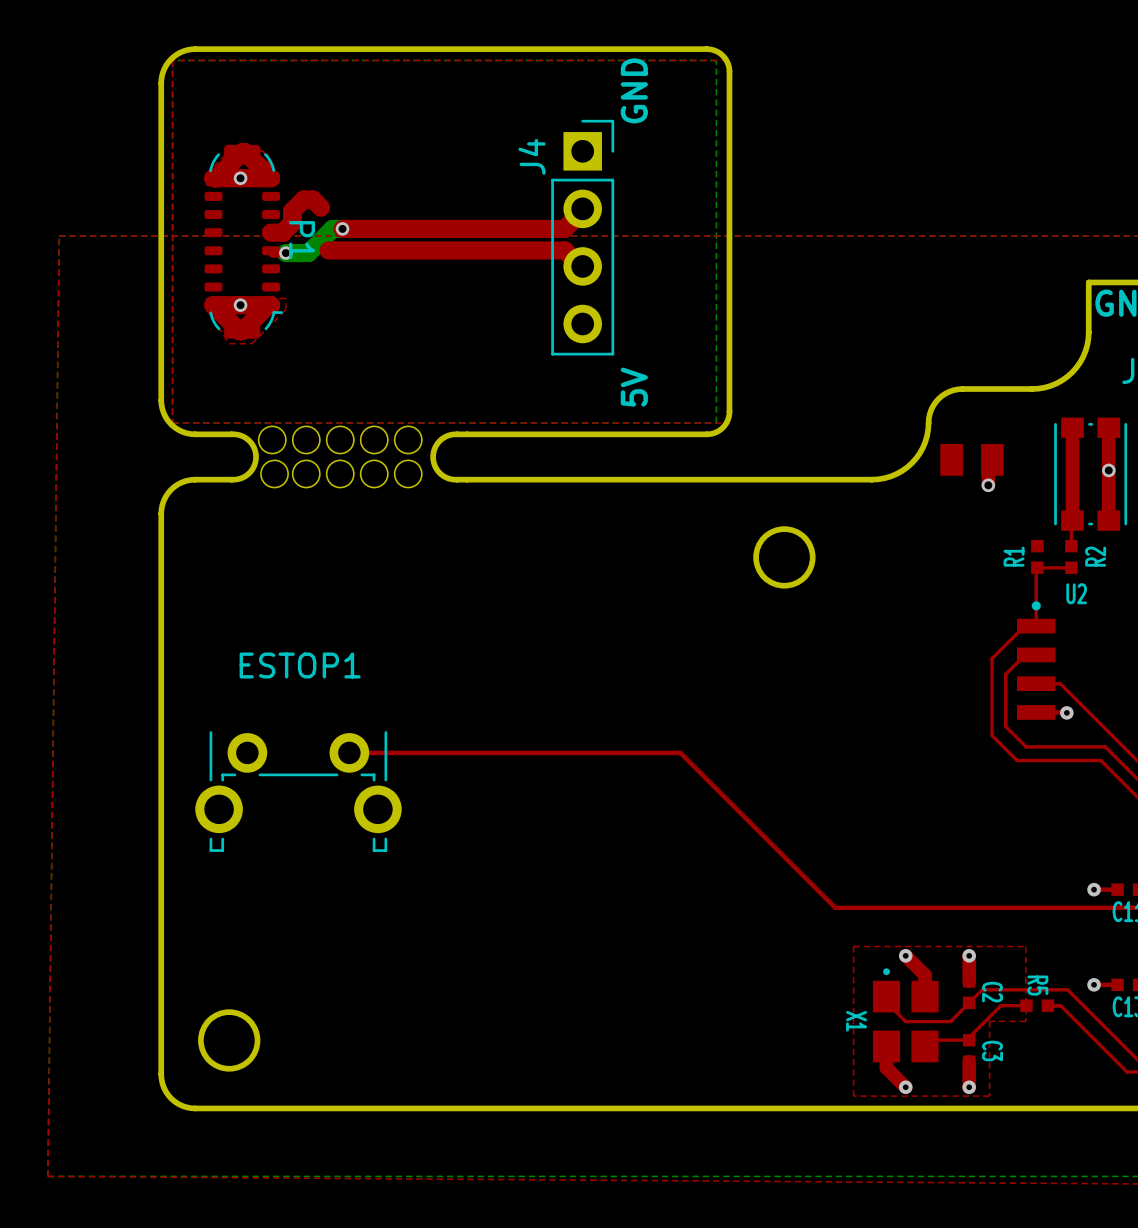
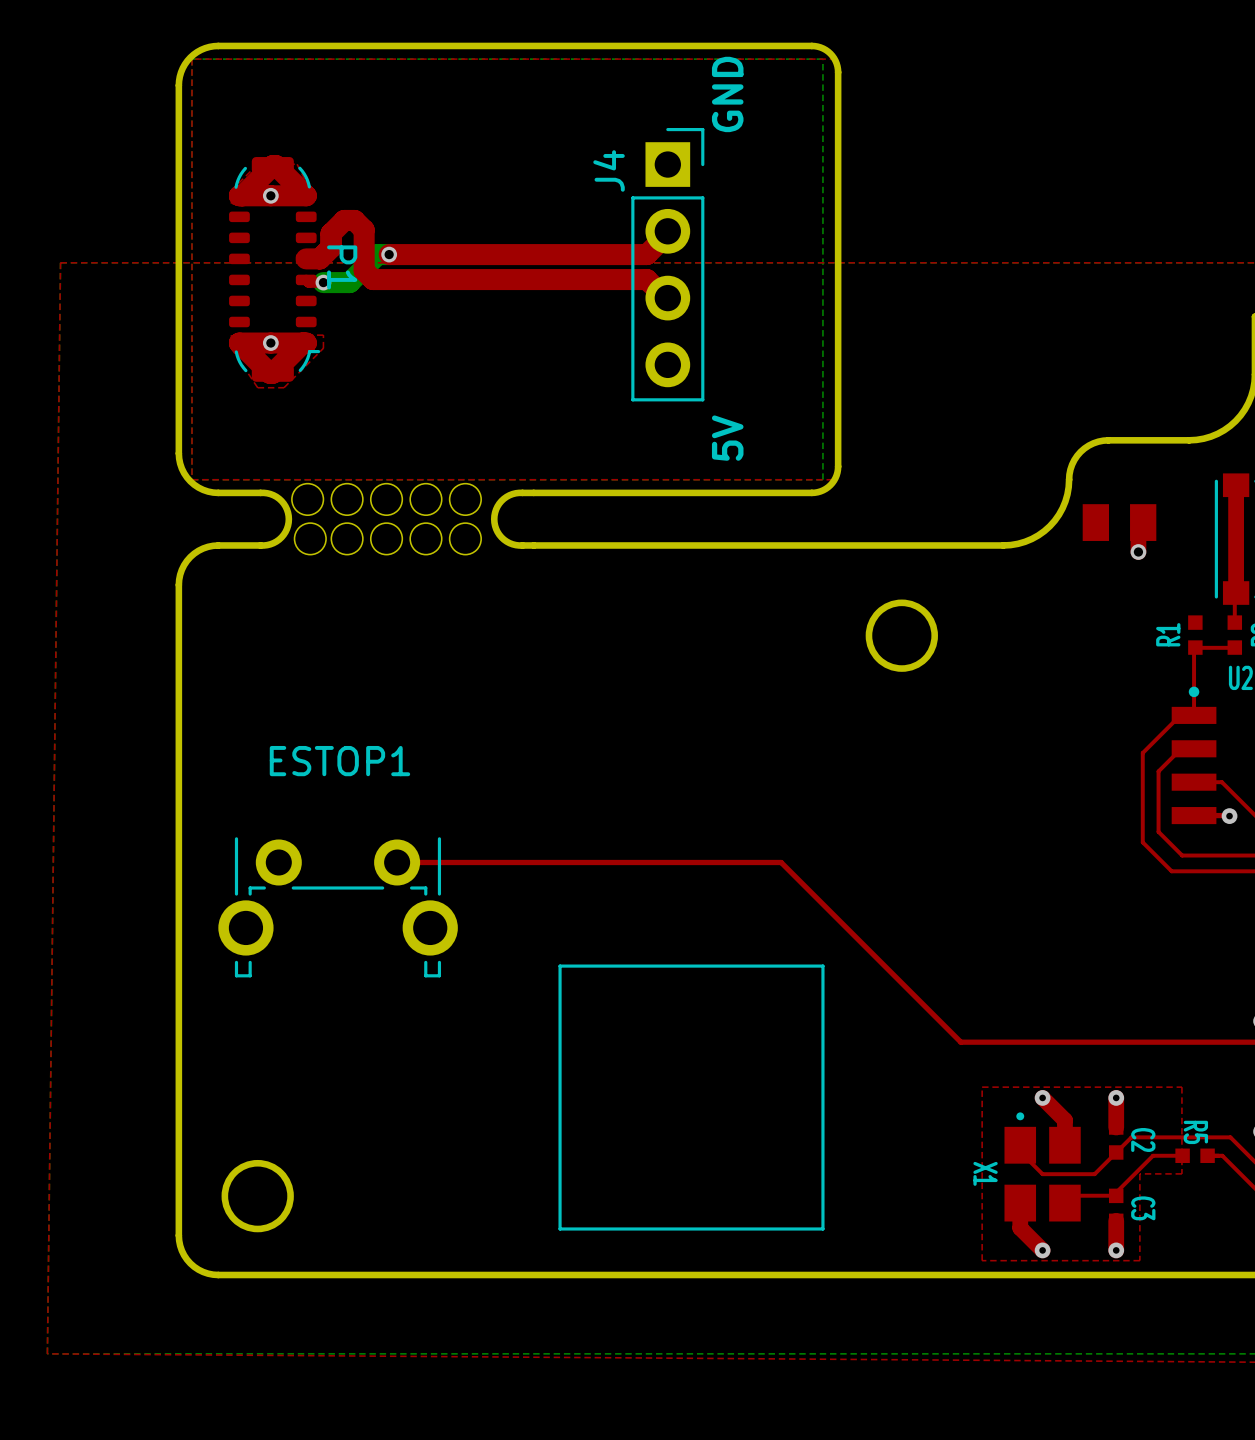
top track: none -> (364, 230) (364, 270) (372, 279)
line: none -> (560, 966) (822, 966) (822, 1228) (560, 1228) (560, 966)

